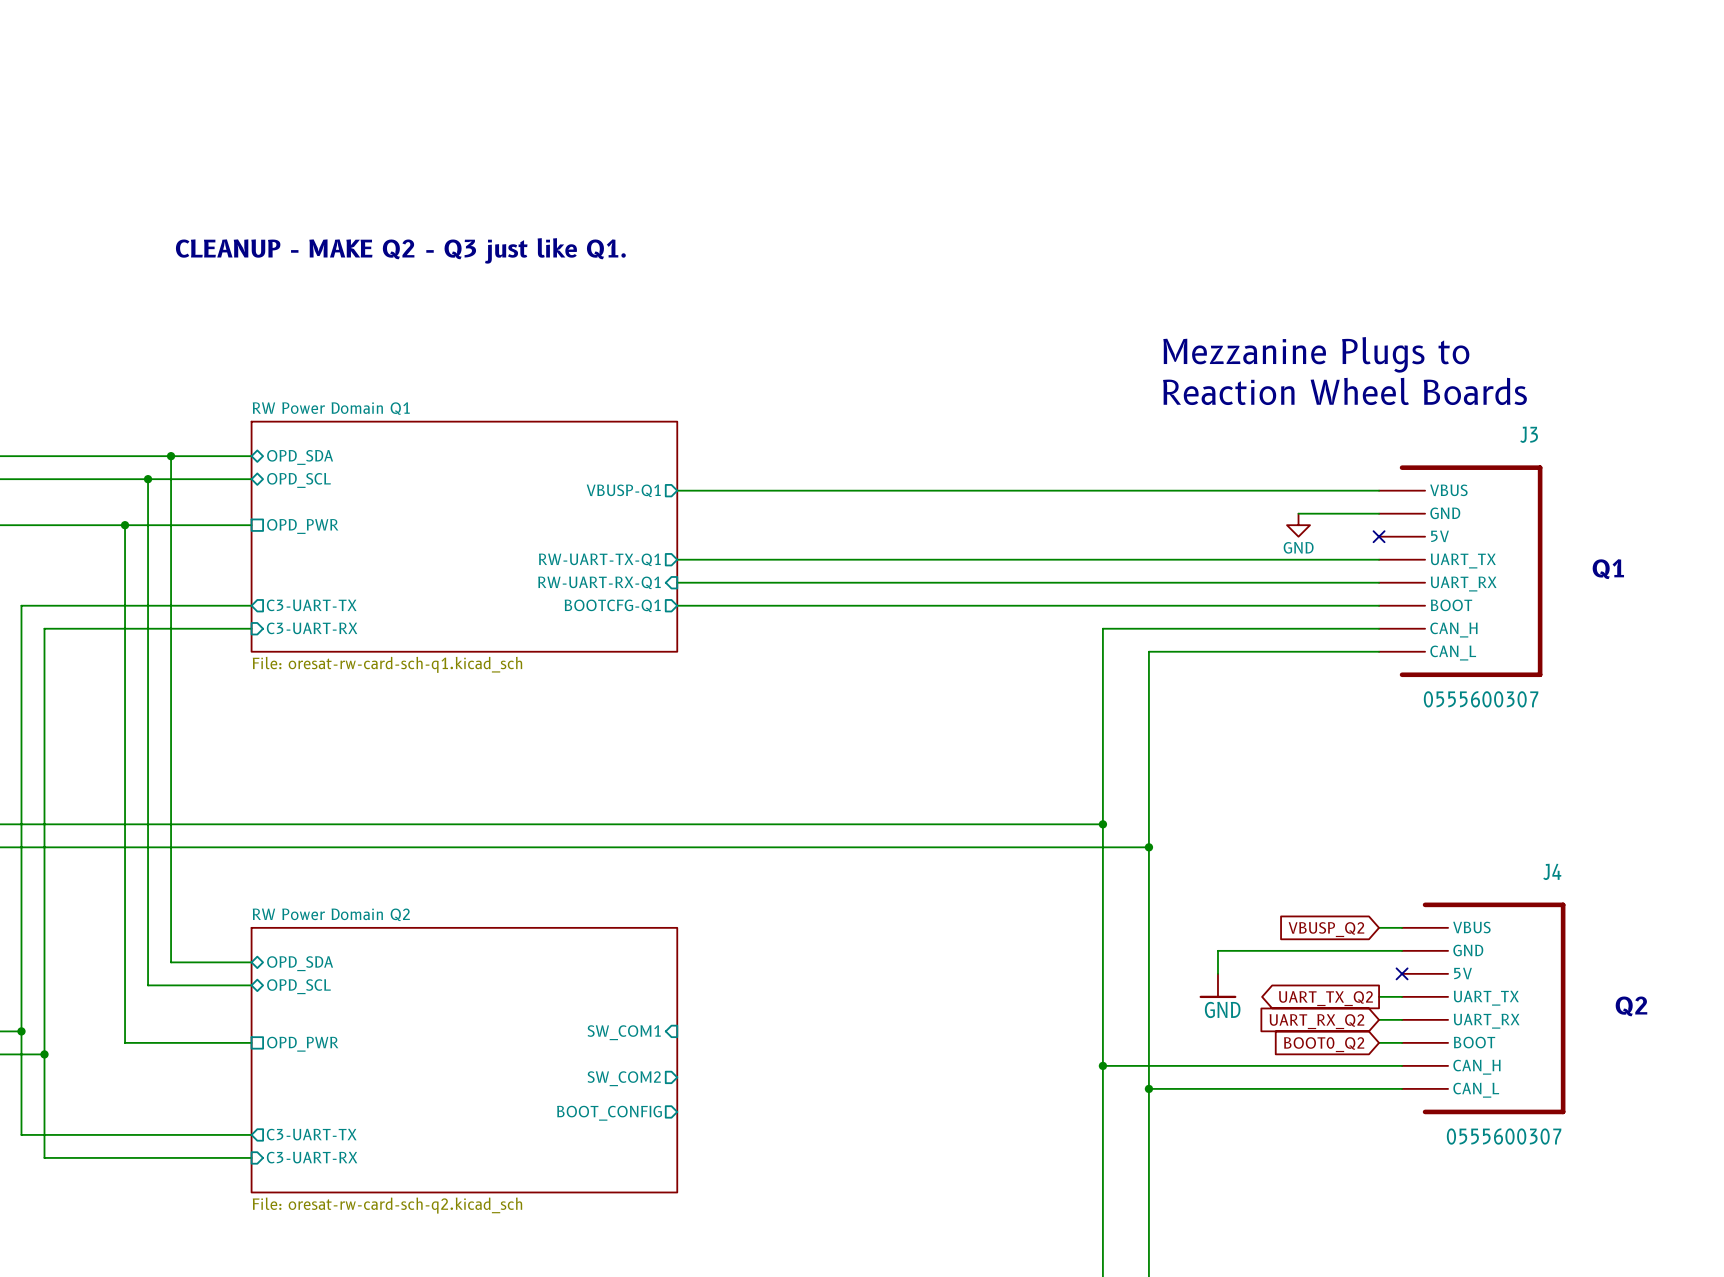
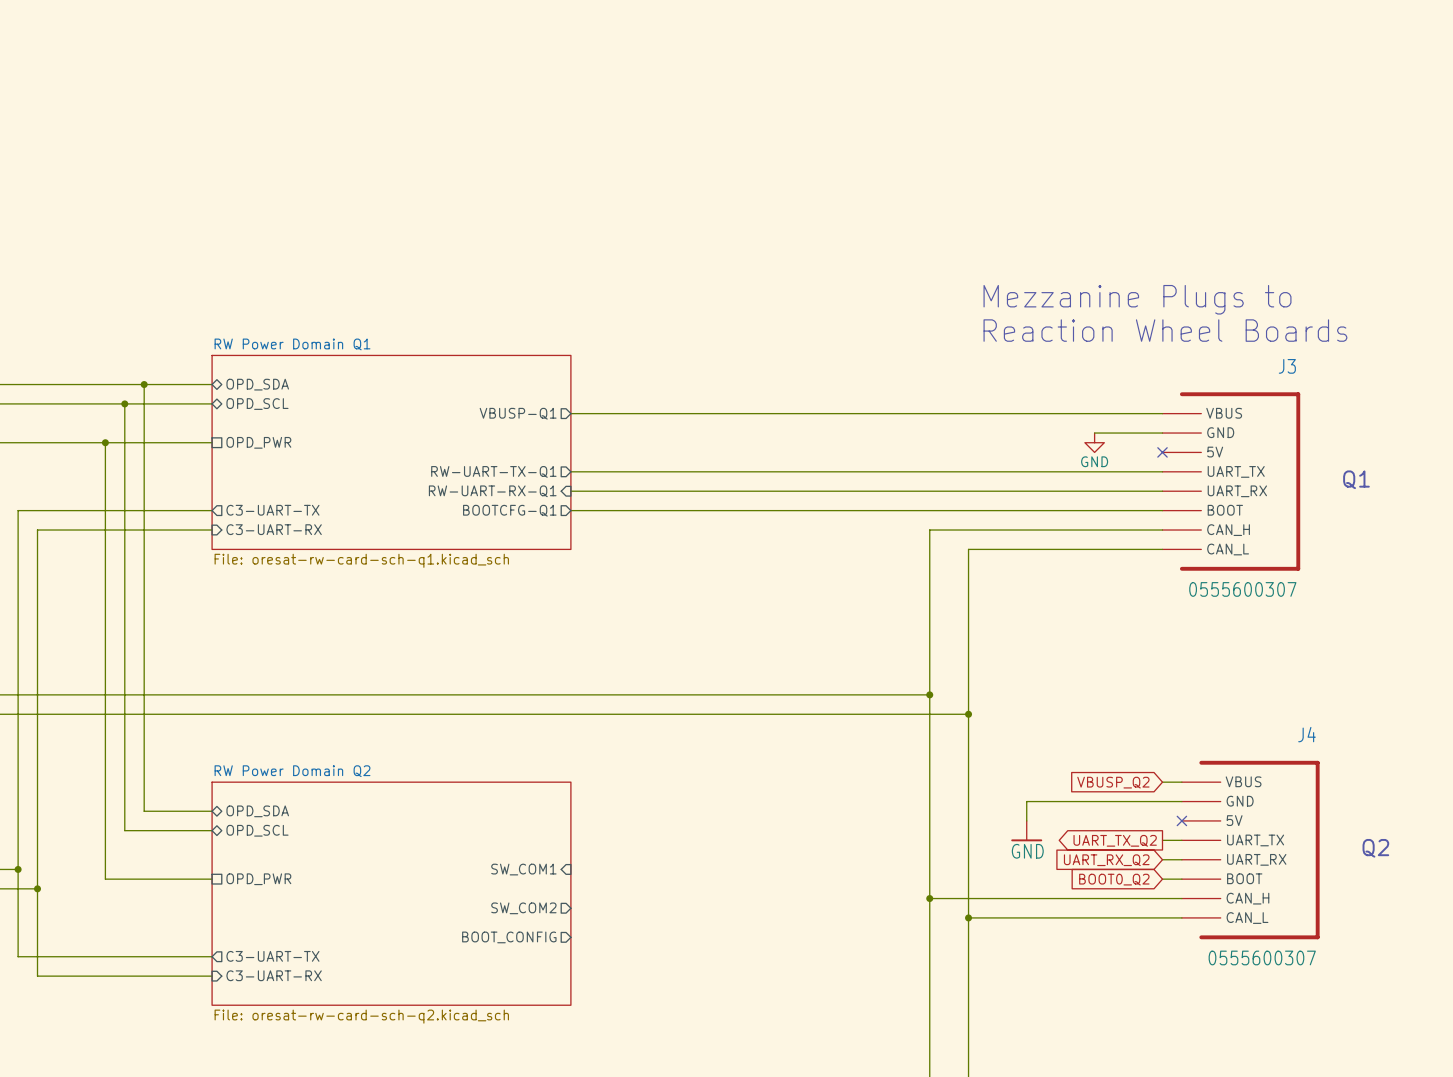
text: CLEANUP - MAKE Q2 - Q3 just like Q1. (400, 250) -> none

